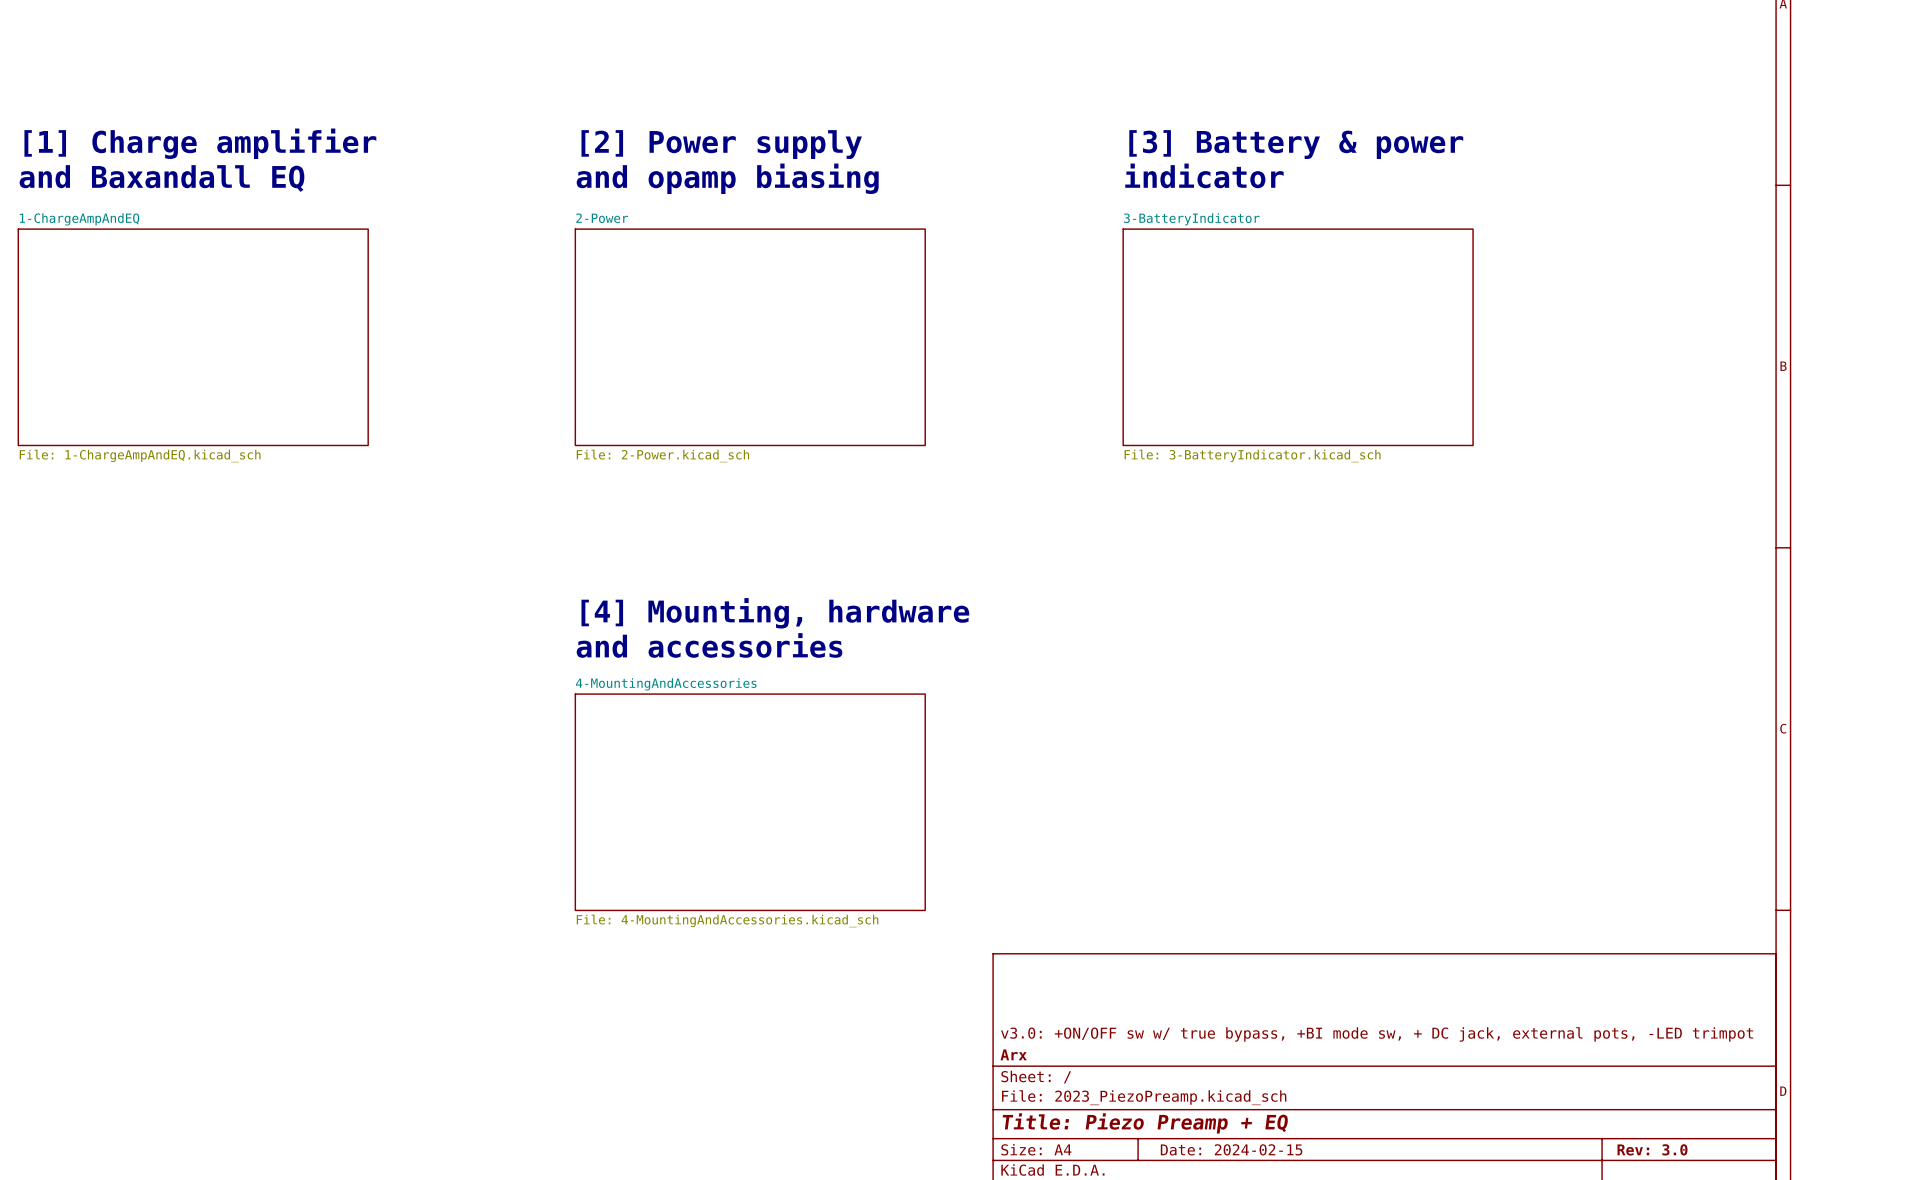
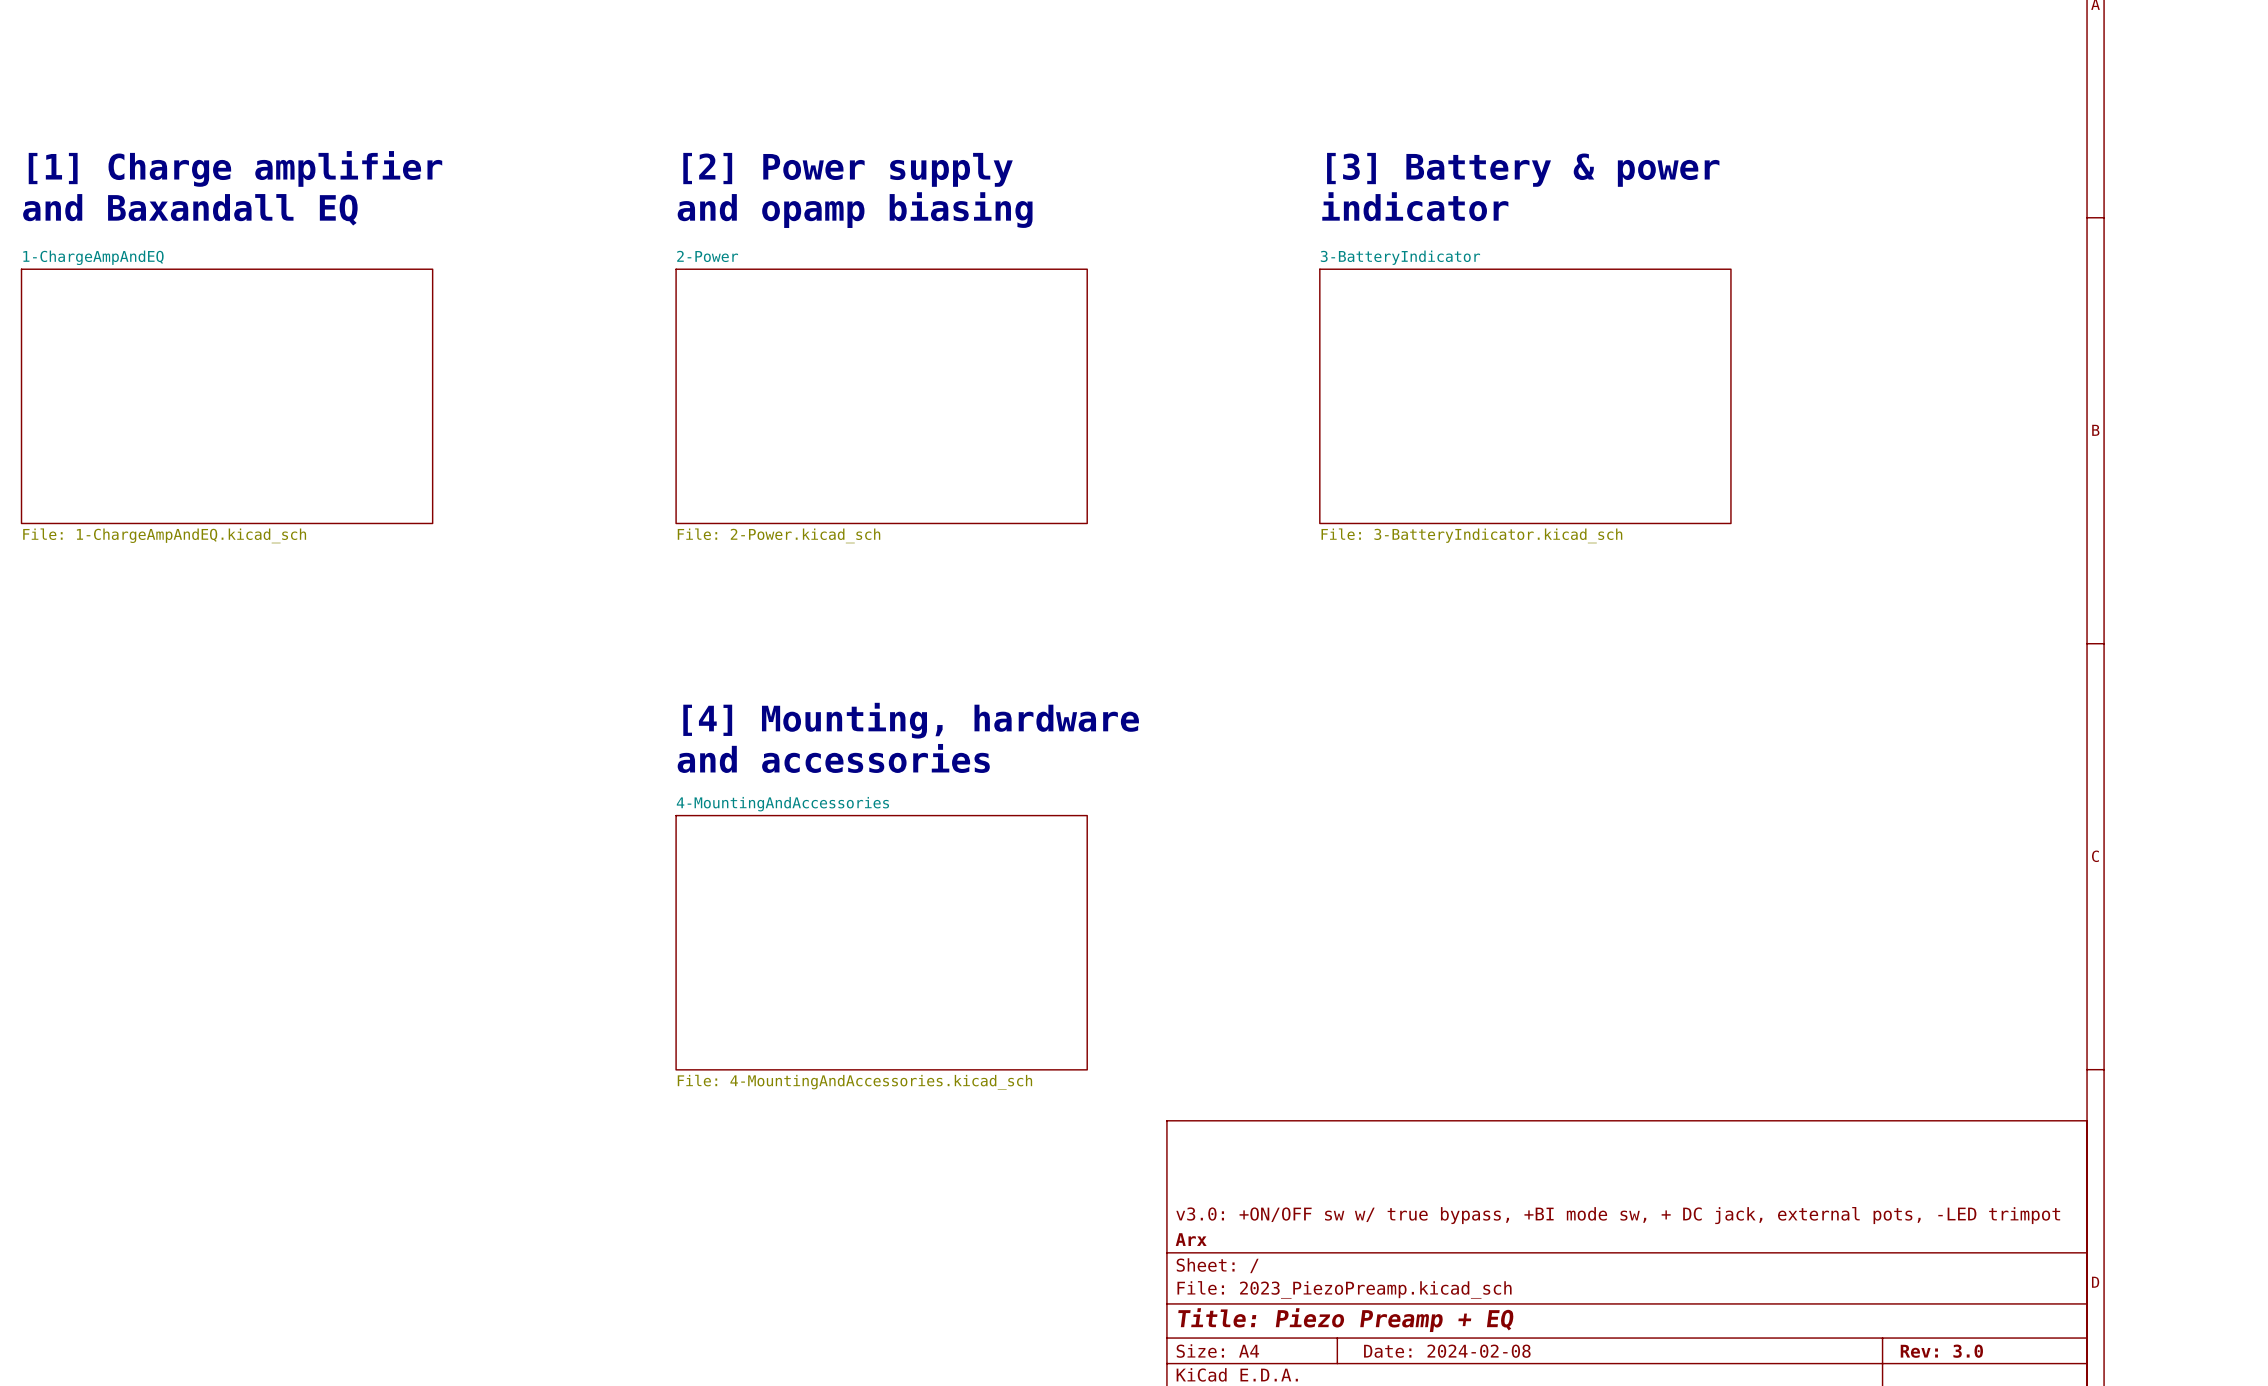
title block: Date: 2024-02-15 (1231, 1149) -> Date: 2024-02-08 (1447, 1351)

